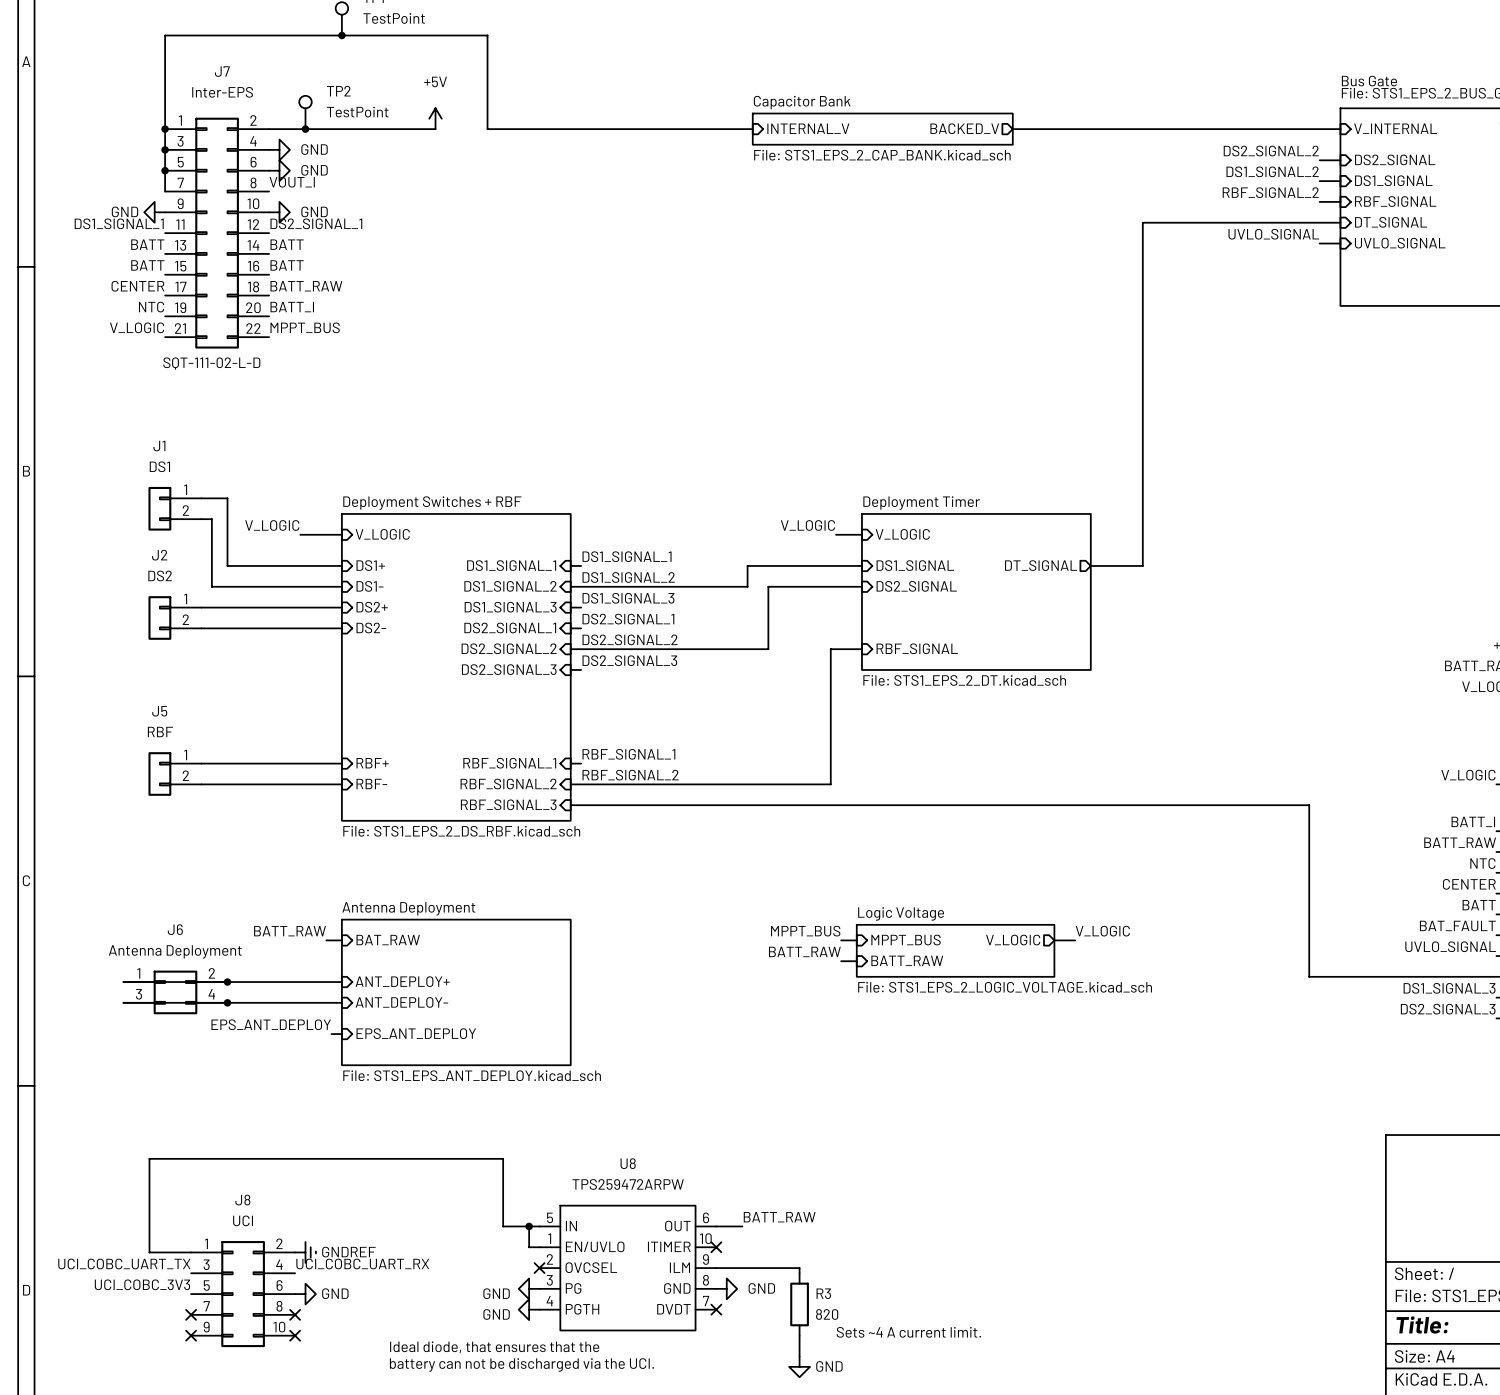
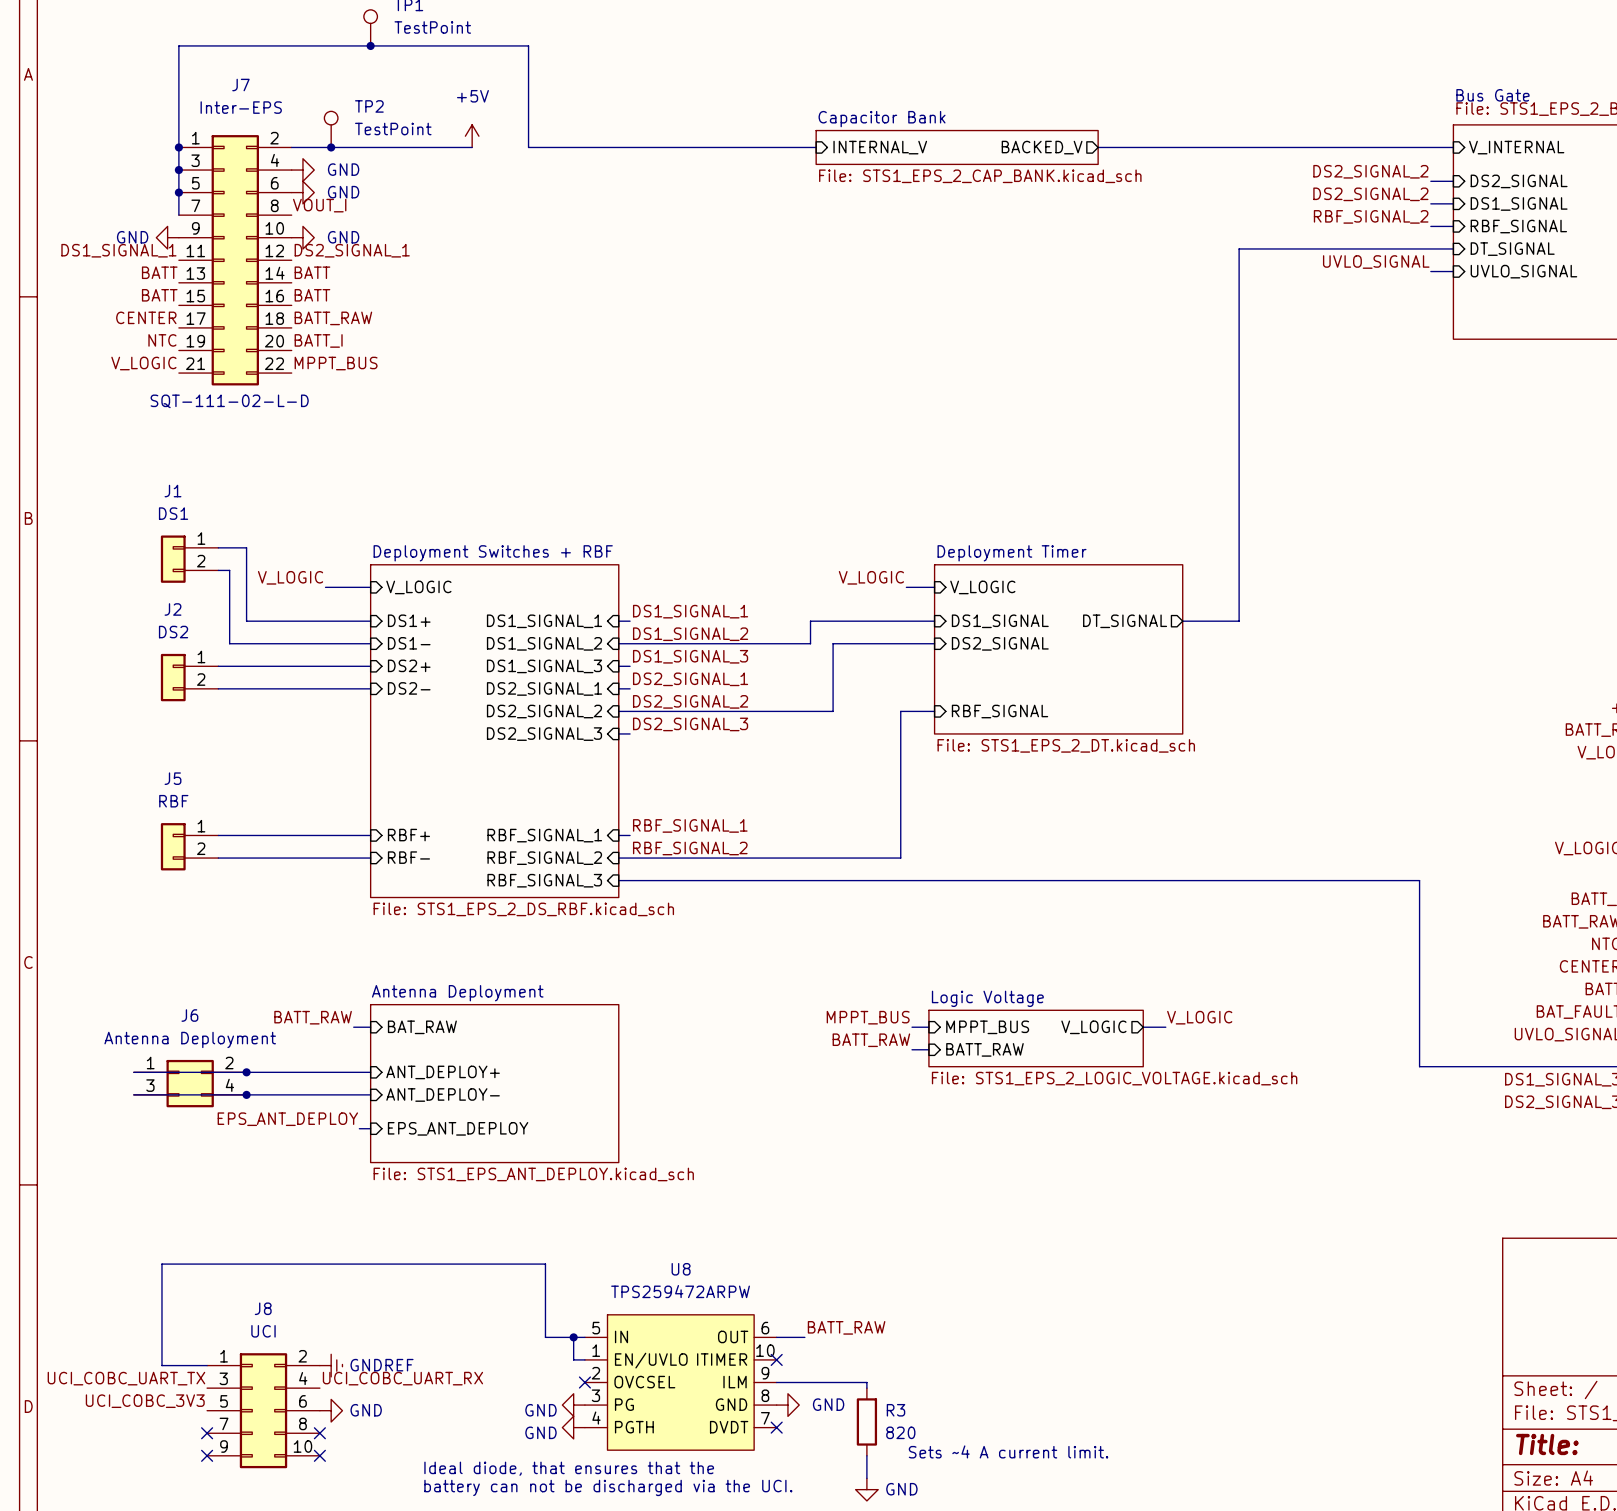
label: DS1_SIGNAL_2 (1272, 171) -> DS2_SIGNAL_2 (1370, 194)

